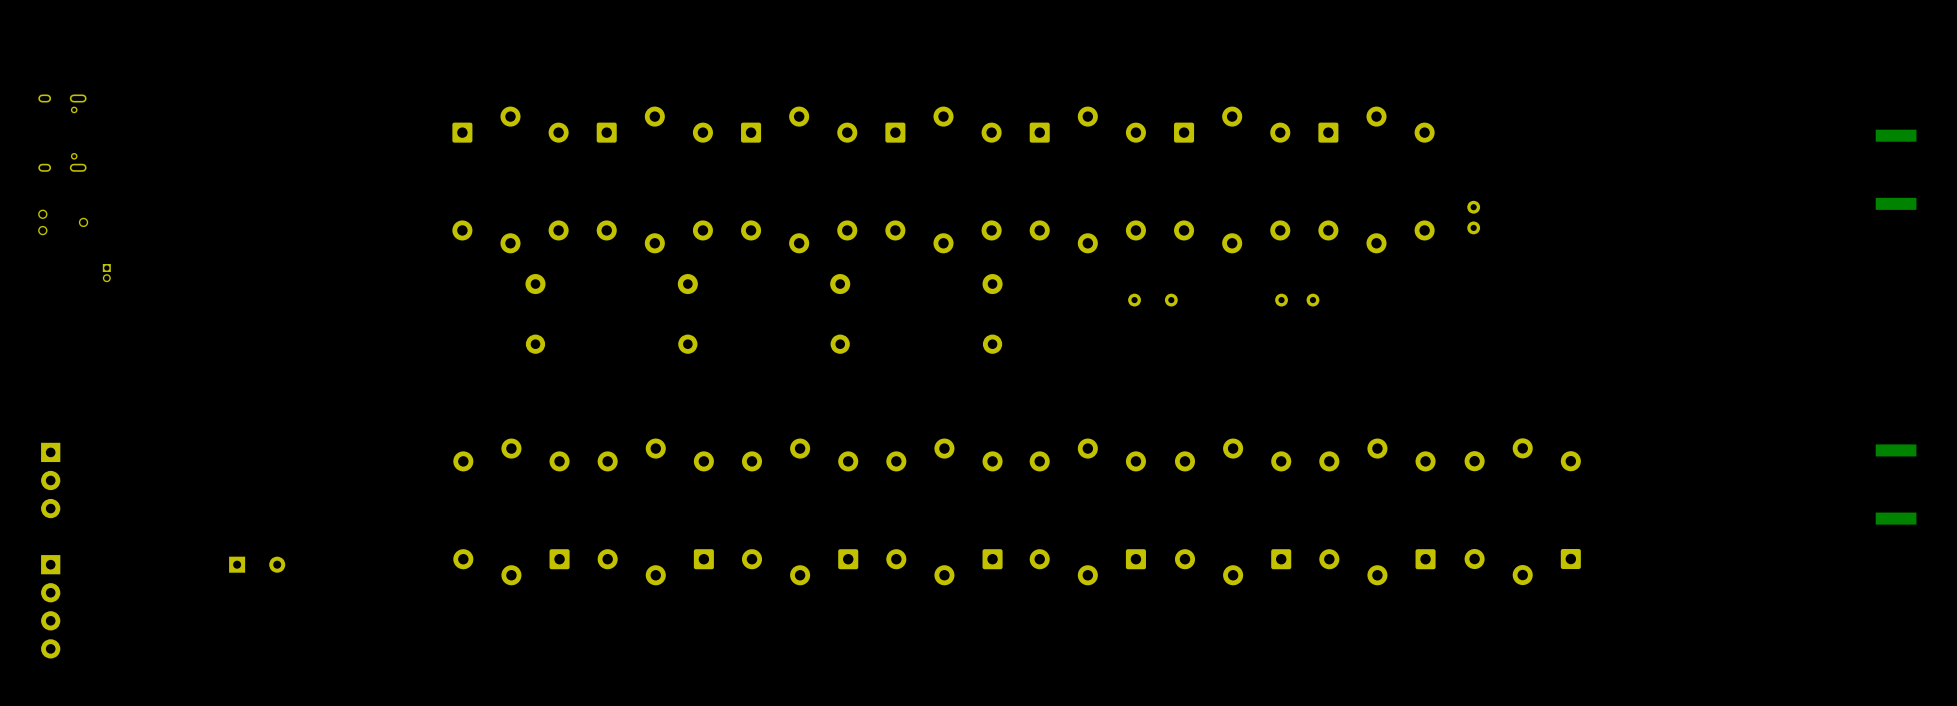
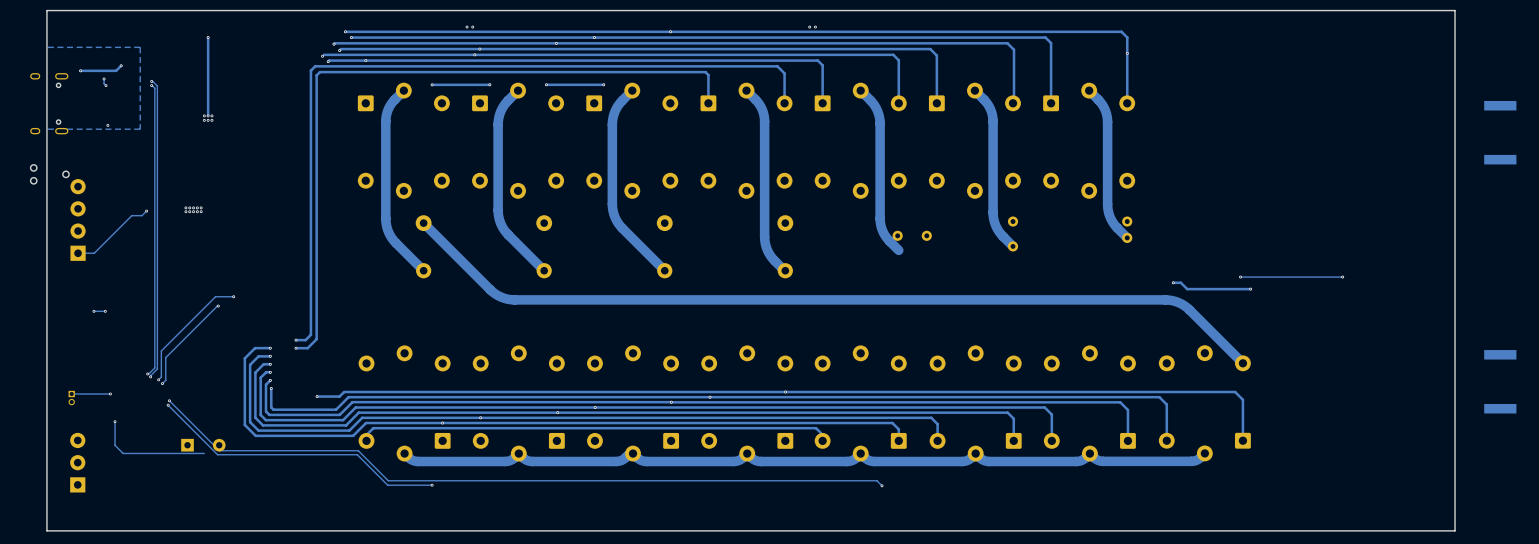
board edge: none -> (1455, 10) (46, 10) (46, 530) (1455, 530) (1455, 10)
via: none -> (467, 27)
via: none -> (472, 27)
via: none -> (809, 27)
via: none -> (815, 27)
track: none -> (345, 31) (1121, 31) (1127, 37) (1127, 103)
via: none -> (345, 31)
via: none -> (670, 31)
track: none -> (208, 37) (208, 115)
via: none -> (208, 37)
track: none -> (351, 37) (1045, 37) (1051, 43) (1051, 103)
via: none -> (351, 37)
via: none -> (594, 37)
via: none -> (556, 43)
track: none -> (333, 44) (1007, 43) (1014, 49) (1013, 103)
via: none -> (333, 44)
zone outline: none -> (46, 47) (140, 47) (140, 129) (46, 129)
via: none -> (479, 49)
track: none -> (339, 50) (930, 49) (936, 55) (936, 103)
via: none -> (339, 50)
via: none -> (1127, 53)
track: none -> (323, 54) (893, 54) (898, 60) (898, 103)
via: none -> (474, 54)
via: none -> (322, 56)
track: none -> (365, 60) (817, 60) (822, 65) (822, 103)
track: none -> (365, 60) (328, 61)
via: none -> (365, 60)
via: none -> (328, 61)
track: none -> (121, 65) (116, 70) (80, 70)
via: none -> (121, 65)
via: none -> (80, 70)
track: none -> (104, 78) (106, 85)
via: none -> (104, 78)
track: none -> (151, 81) (157, 86) (157, 368) (150, 376)
via: none -> (151, 81)
via: none -> (432, 84)
track: none -> (489, 84) (432, 84)
via: none -> (489, 84)
via: none -> (546, 84)
track: none -> (603, 84) (546, 84)
via: none -> (603, 84)
via: none -> (106, 85)
track: none -> (151, 85) (154, 88) (154, 367) (147, 373)
via: none -> (151, 85)
track: none -> (403, 90) (391, 104) (385, 118) (385, 221) (393, 240) (423, 270)
track: none -> (518, 90) (503, 105) (498, 118) (498, 213) (505, 232) (544, 270)
track: none -> (632, 90) (618, 105) (612, 118) (613, 210) (620, 225) (664, 270)
track: none -> (746, 90) (759, 104) (764, 118) (765, 243) (770, 255) (784, 270)
track: none -> (860, 90) (874, 105) (879, 117) (880, 221) (885, 236) (898, 250)
track: none -> (974, 90) (987, 104) (992, 118) (993, 219) (998, 231) (1013, 246)
track: none -> (1089, 90) (1102, 104) (1106, 115) (1109, 214) (1115, 225) (1127, 237)
track: none -> (708, 103) (708, 75) (705, 72) (319, 72) (316, 75) (316, 339) (307, 348) (296, 348)
track: none -> (784, 103) (784, 73) (777, 66) (315, 66) (310, 70) (310, 334) (305, 340) (296, 340)
via: none -> (204, 115)
via: none -> (208, 115)
via: none -> (211, 115)
via: none -> (204, 120)
via: none -> (208, 120)
via: none -> (211, 120)
via: none -> (107, 125)
part position: (1473, 217) -> (1127, 229)
via: none -> (185, 207)
via: none -> (189, 207)
via: none -> (193, 207)
via: none -> (197, 207)
via: none -> (201, 207)
track: none -> (146, 211) (141, 215) (131, 215) (94, 253) (78, 253)
via: none -> (146, 211)
via: none -> (185, 211)
via: none -> (189, 211)
via: none -> (193, 211)
via: none -> (197, 211)
via: none -> (201, 211)
part: (106, 273) -> none
part: none -> (78, 219)
track: none -> (423, 223) (492, 292) (507, 299) (1168, 300) (1187, 307) (1242, 363)
part rotation: 0° (1297, 300) -> 90° clockwise (1013, 233)
via: none -> (1240, 277)
track: none -> (1342, 277) (1240, 277)
via: none -> (1342, 277)
track: none -> (1173, 282) (1180, 282) (1187, 289) (1250, 289)
via: none -> (1173, 282)
via: none -> (1250, 289)
track: none -> (233, 296) (215, 296) (161, 350) (161, 377) (158, 379)
via: none -> (233, 296)
track: none -> (218, 306) (165, 357) (165, 380) (162, 383)
via: none -> (218, 306)
via: none -> (93, 311)
track: none -> (105, 311) (93, 311)
via: none -> (105, 311)
via: none -> (296, 340)
track: none -> (270, 348) (255, 348) (244, 358) (244, 424) (255, 435) (353, 435) (366, 423) (892, 423) (898, 429) (898, 440)
via: none -> (270, 348)
via: none -> (296, 348)
track: none -> (270, 356) (258, 356) (250, 364) (250, 422) (258, 430) (349, 430) (362, 417) (931, 417) (937, 424) (937, 440)
via: none -> (270, 356)
track: none -> (270, 364) (263, 364) (255, 372) (255, 417) (263, 425) (346, 425) (358, 412) (1007, 412) (1013, 418) (1013, 440)
via: none -> (270, 364)
track: none -> (270, 372) (266, 372) (260, 377) (260, 414) (265, 420) (343, 420) (355, 407) (1044, 407) (1051, 414) (1051, 440)
via: none -> (270, 372)
via: none -> (147, 373)
via: none -> (150, 376)
part rotation: 0° (50, 480) -> 180° (77, 462)
part position: (50, 480) -> (77, 462)
via: none -> (158, 379)
track: none -> (270, 380) (265, 384) (265, 411)
via: none -> (270, 380)
via: none -> (162, 383)
track: none -> (271, 388) (271, 407) (273, 409) (336, 409) (348, 397) (1159, 397) (1166, 404) (1166, 440)
via: none -> (271, 388)
via: none -> (785, 392)
track: none -> (110, 394) (71, 394)
via: none -> (110, 394)
track: none -> (317, 396) (339, 396) (344, 392) (1235, 392) (1242, 399) (1242, 440)
via: none -> (317, 396)
via: none -> (710, 397)
part: none -> (71, 398)
track: none -> (169, 400) (219, 450) (358, 450) (388, 480) (876, 480) (882, 485)
via: none -> (169, 400)
track: none -> (671, 402) (352, 402) (339, 414) (269, 414) (266, 411)
track: none -> (671, 402) (1120, 402) (1127, 410) (1127, 440)
via: none -> (671, 402)
track: none -> (168, 405) (217, 454) (357, 454) (387, 485) (432, 485)
via: none -> (168, 405)
via: none -> (595, 407)
via: none -> (557, 412)
via: none -> (480, 417)
track: none -> (115, 421) (115, 445) (123, 453) (204, 453)
via: none -> (115, 421)
via: none -> (442, 423)
track: none -> (822, 434) (816, 428) (373, 428) (366, 435) (366, 440)
track: none -> (404, 453) (411, 459) (418, 461) (505, 461) (518, 455) (532, 461) (616, 461) (622, 459) (631, 453) (639, 459) (646, 461) (733, 461) (747, 455) (760, 461) (847, 461) (860, 455) (874, 461) (962, 461) (975, 455) (989, 461) (1076, 461) (1085, 457)
track: none -> (1204, 453) (1198, 459) (1191, 461) (1103, 461) (1091, 455) (1086, 457)
part: (50, 606) -> none
via: none -> (432, 485)
via: none -> (882, 485)

